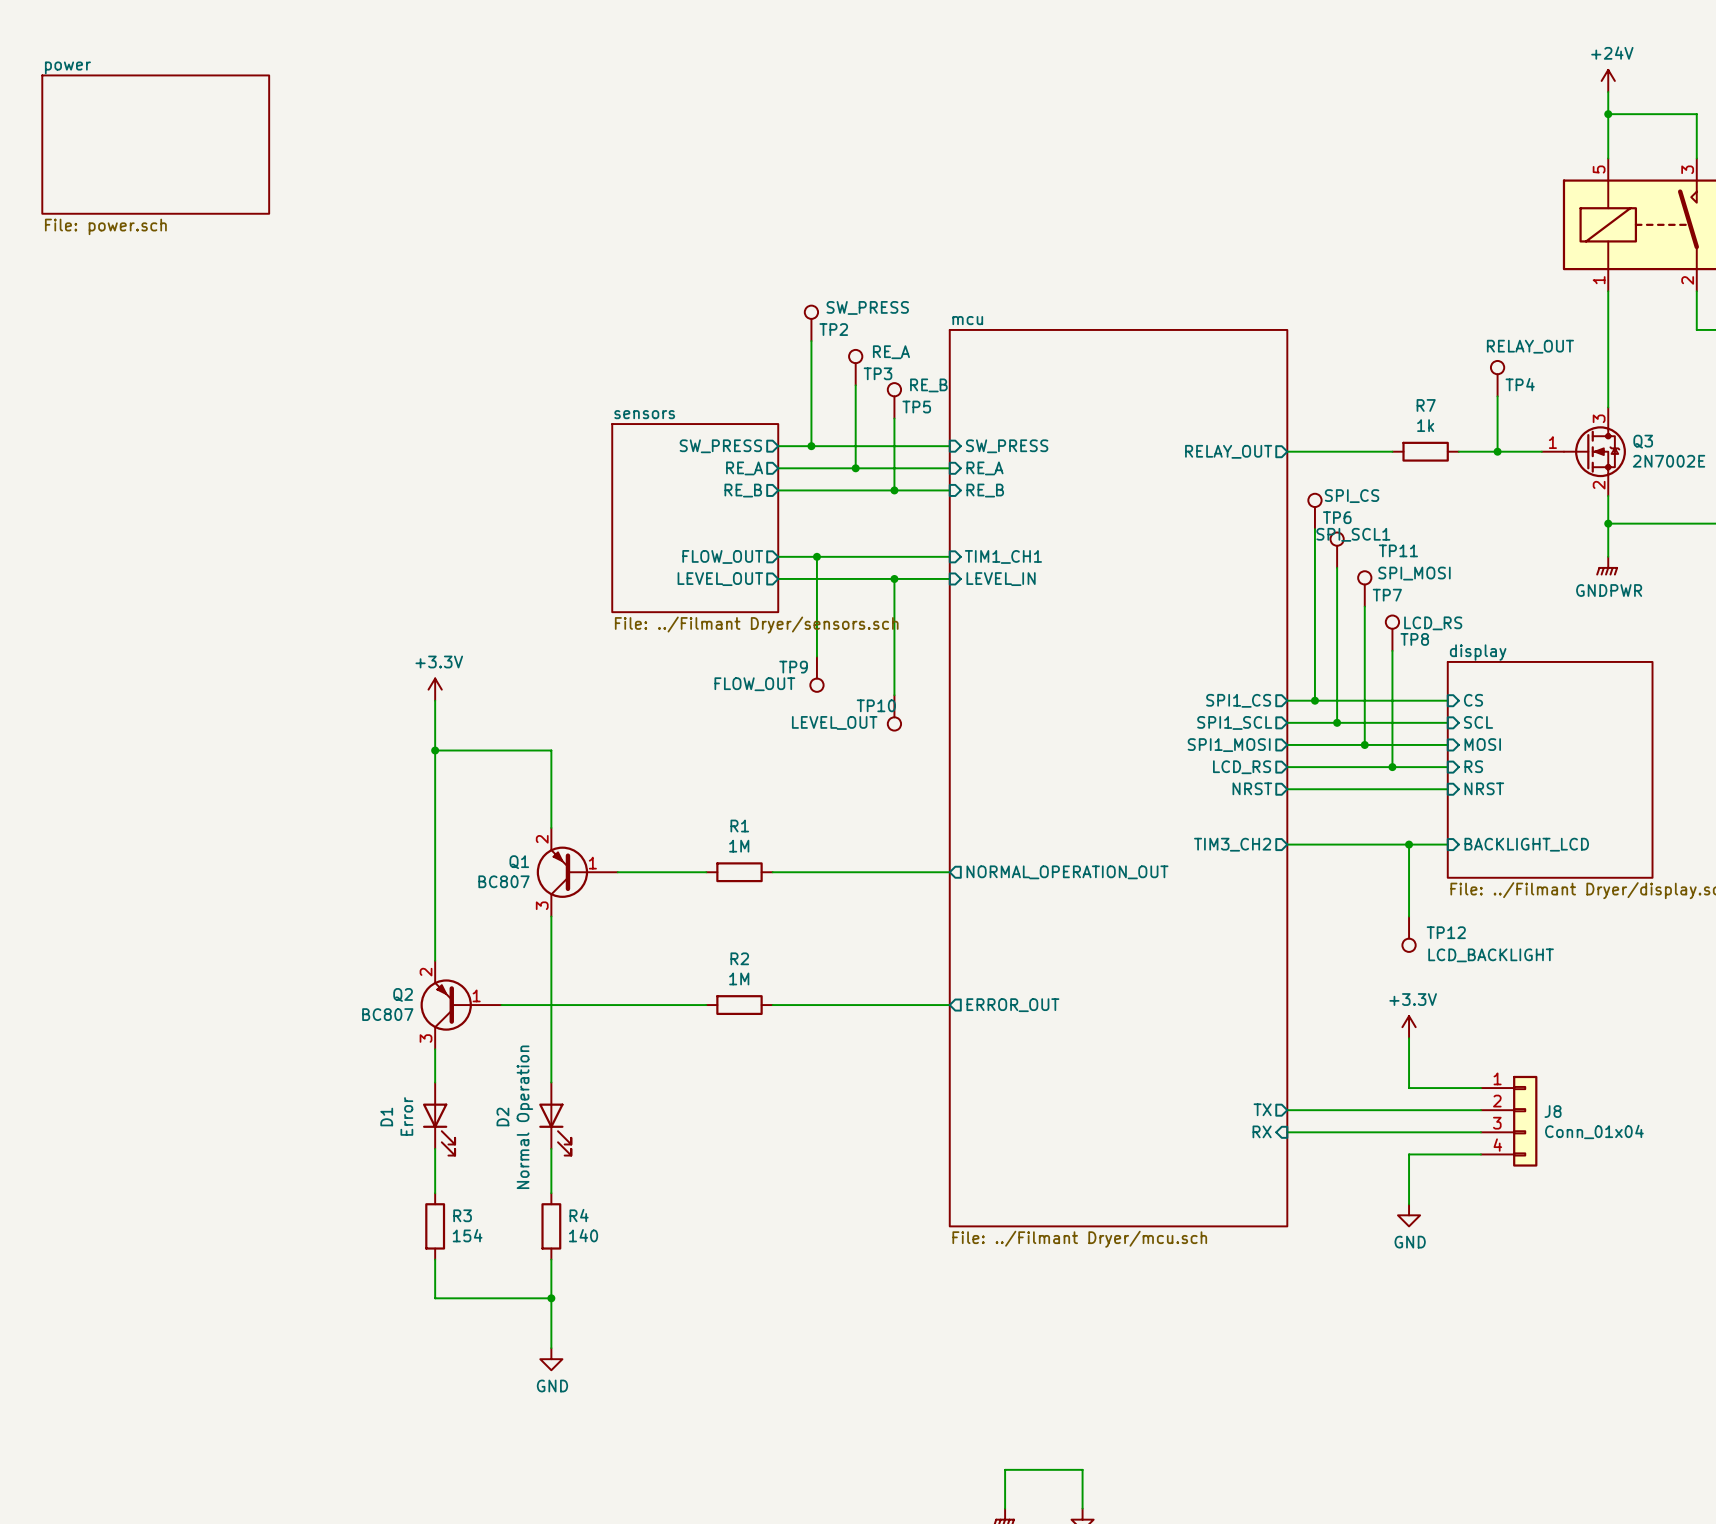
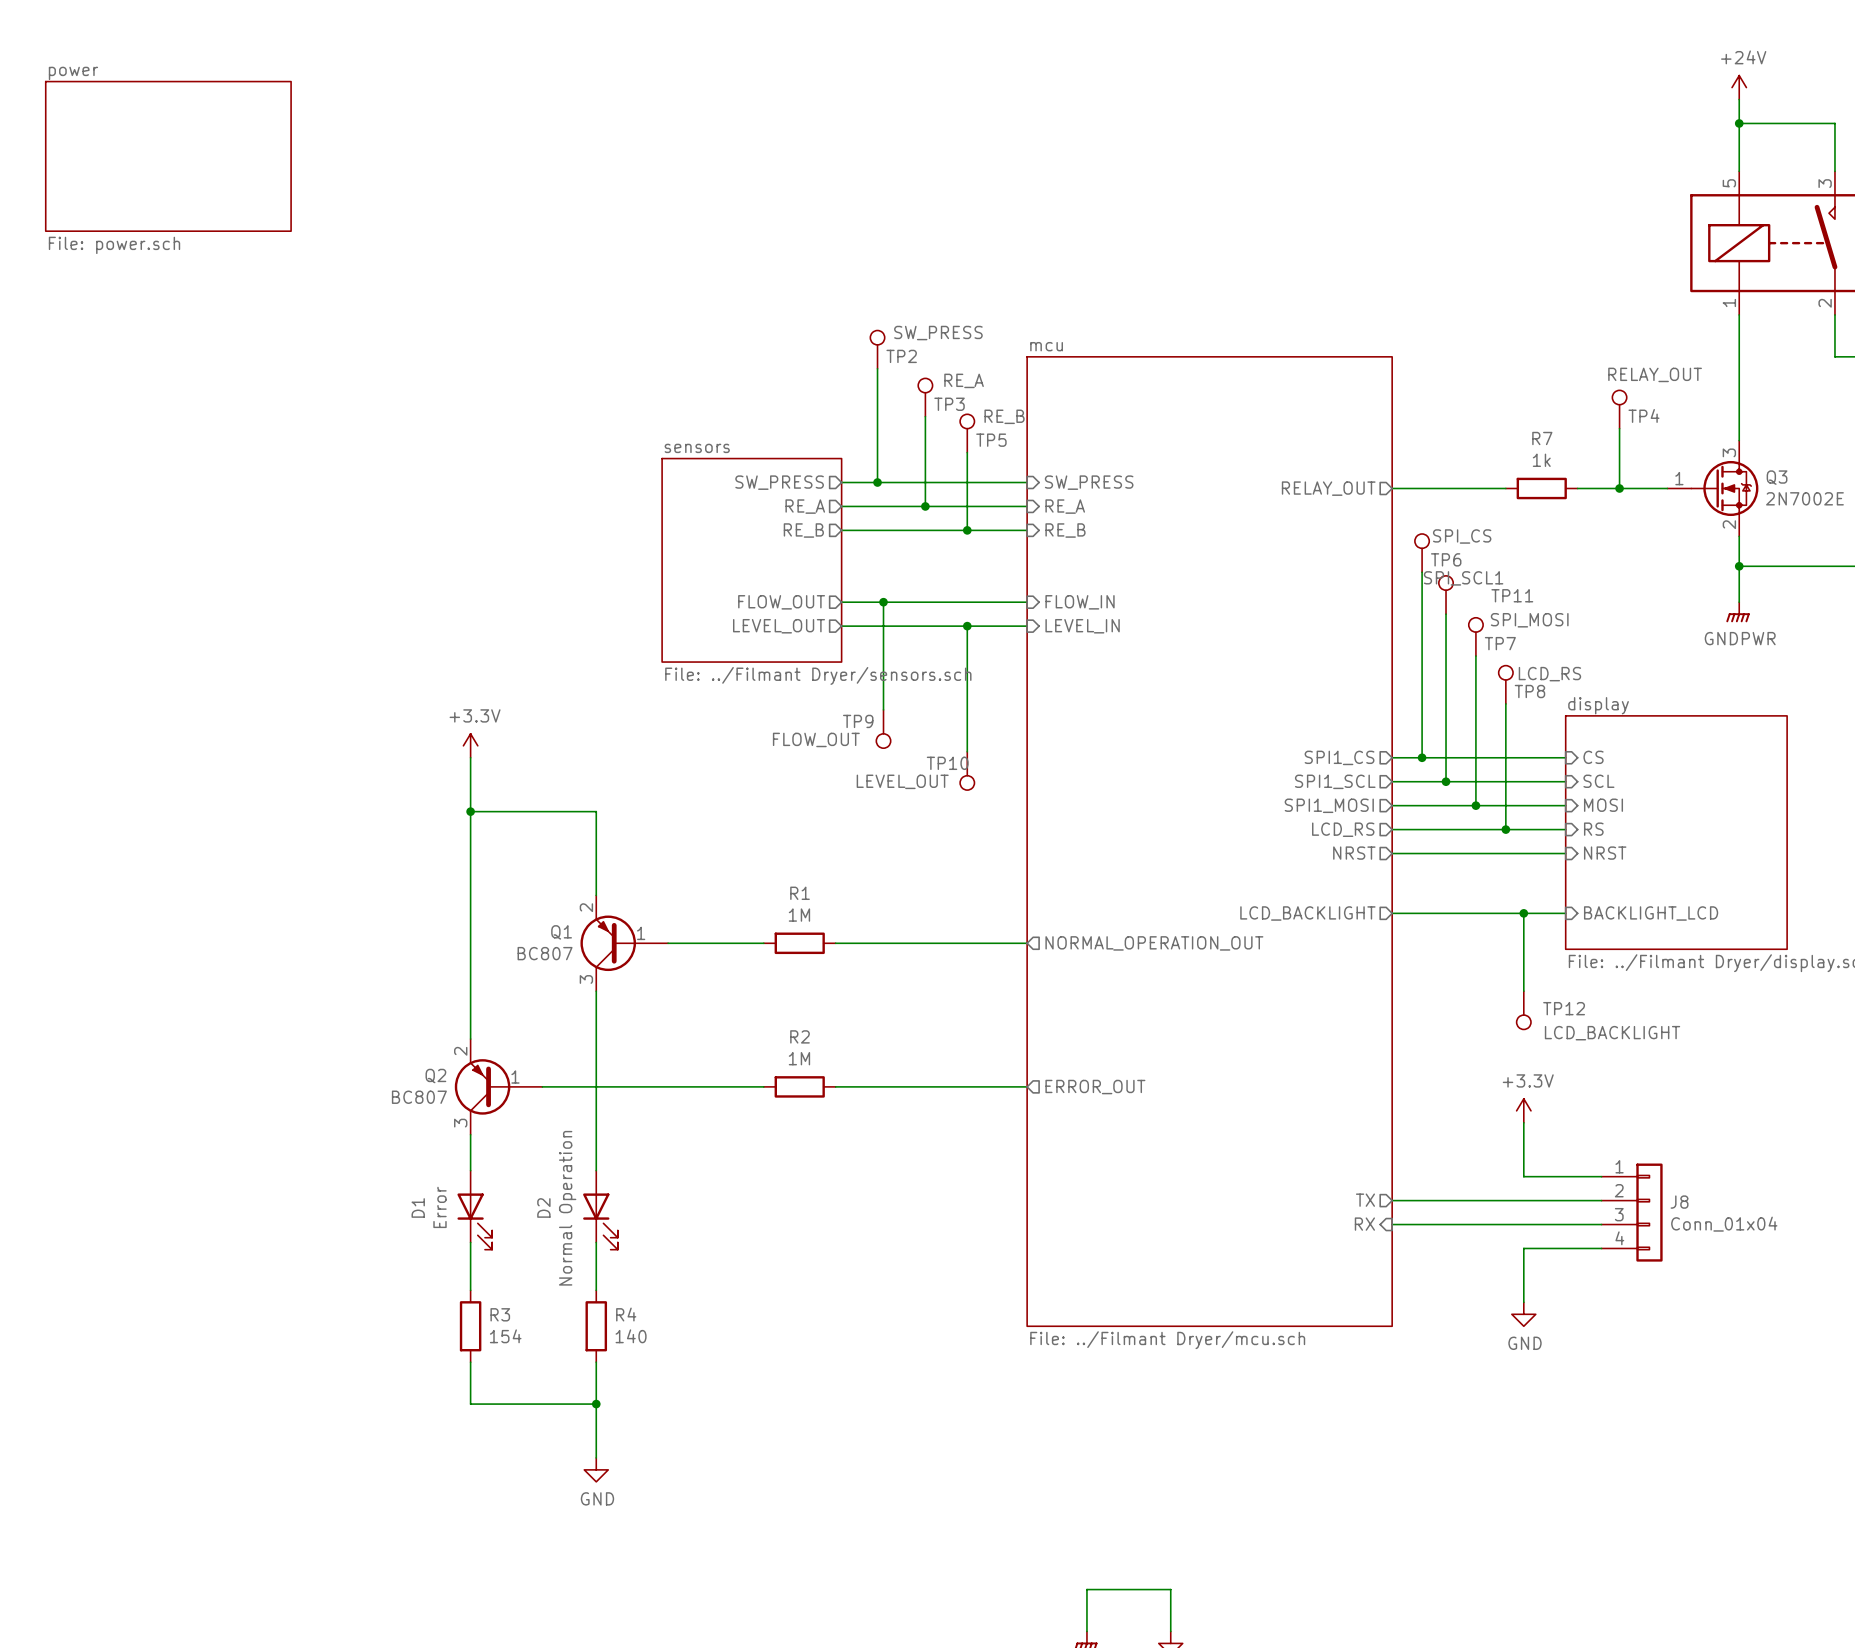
sheet pin: TIM1_CH1 (1003, 556) -> FLOW_IN (1080, 602)
sheet pin: TIM3_CH2 (1232, 844) -> LCD_BACKLIGHT (1307, 913)

